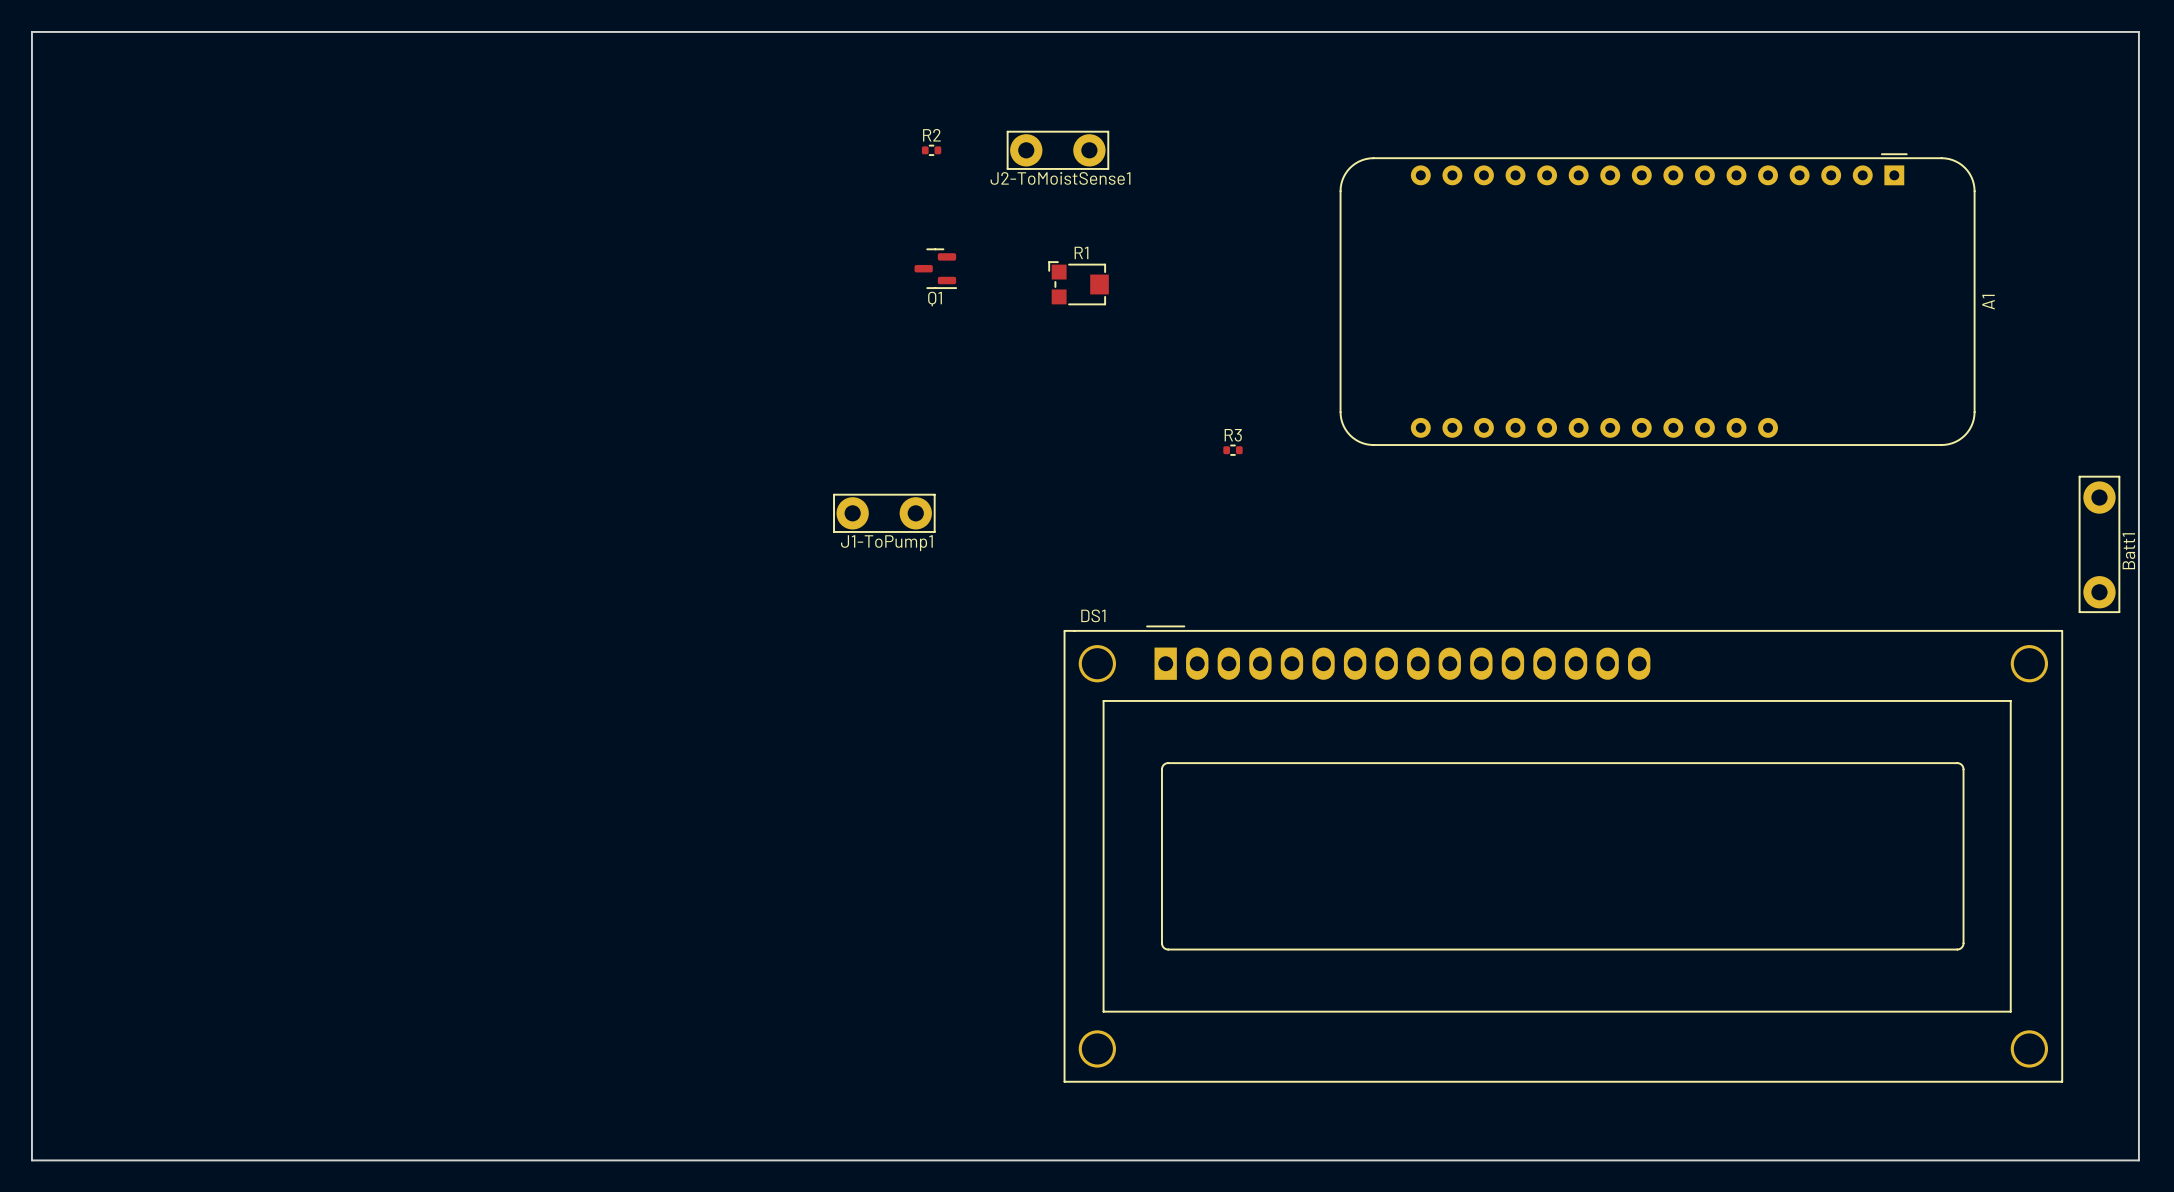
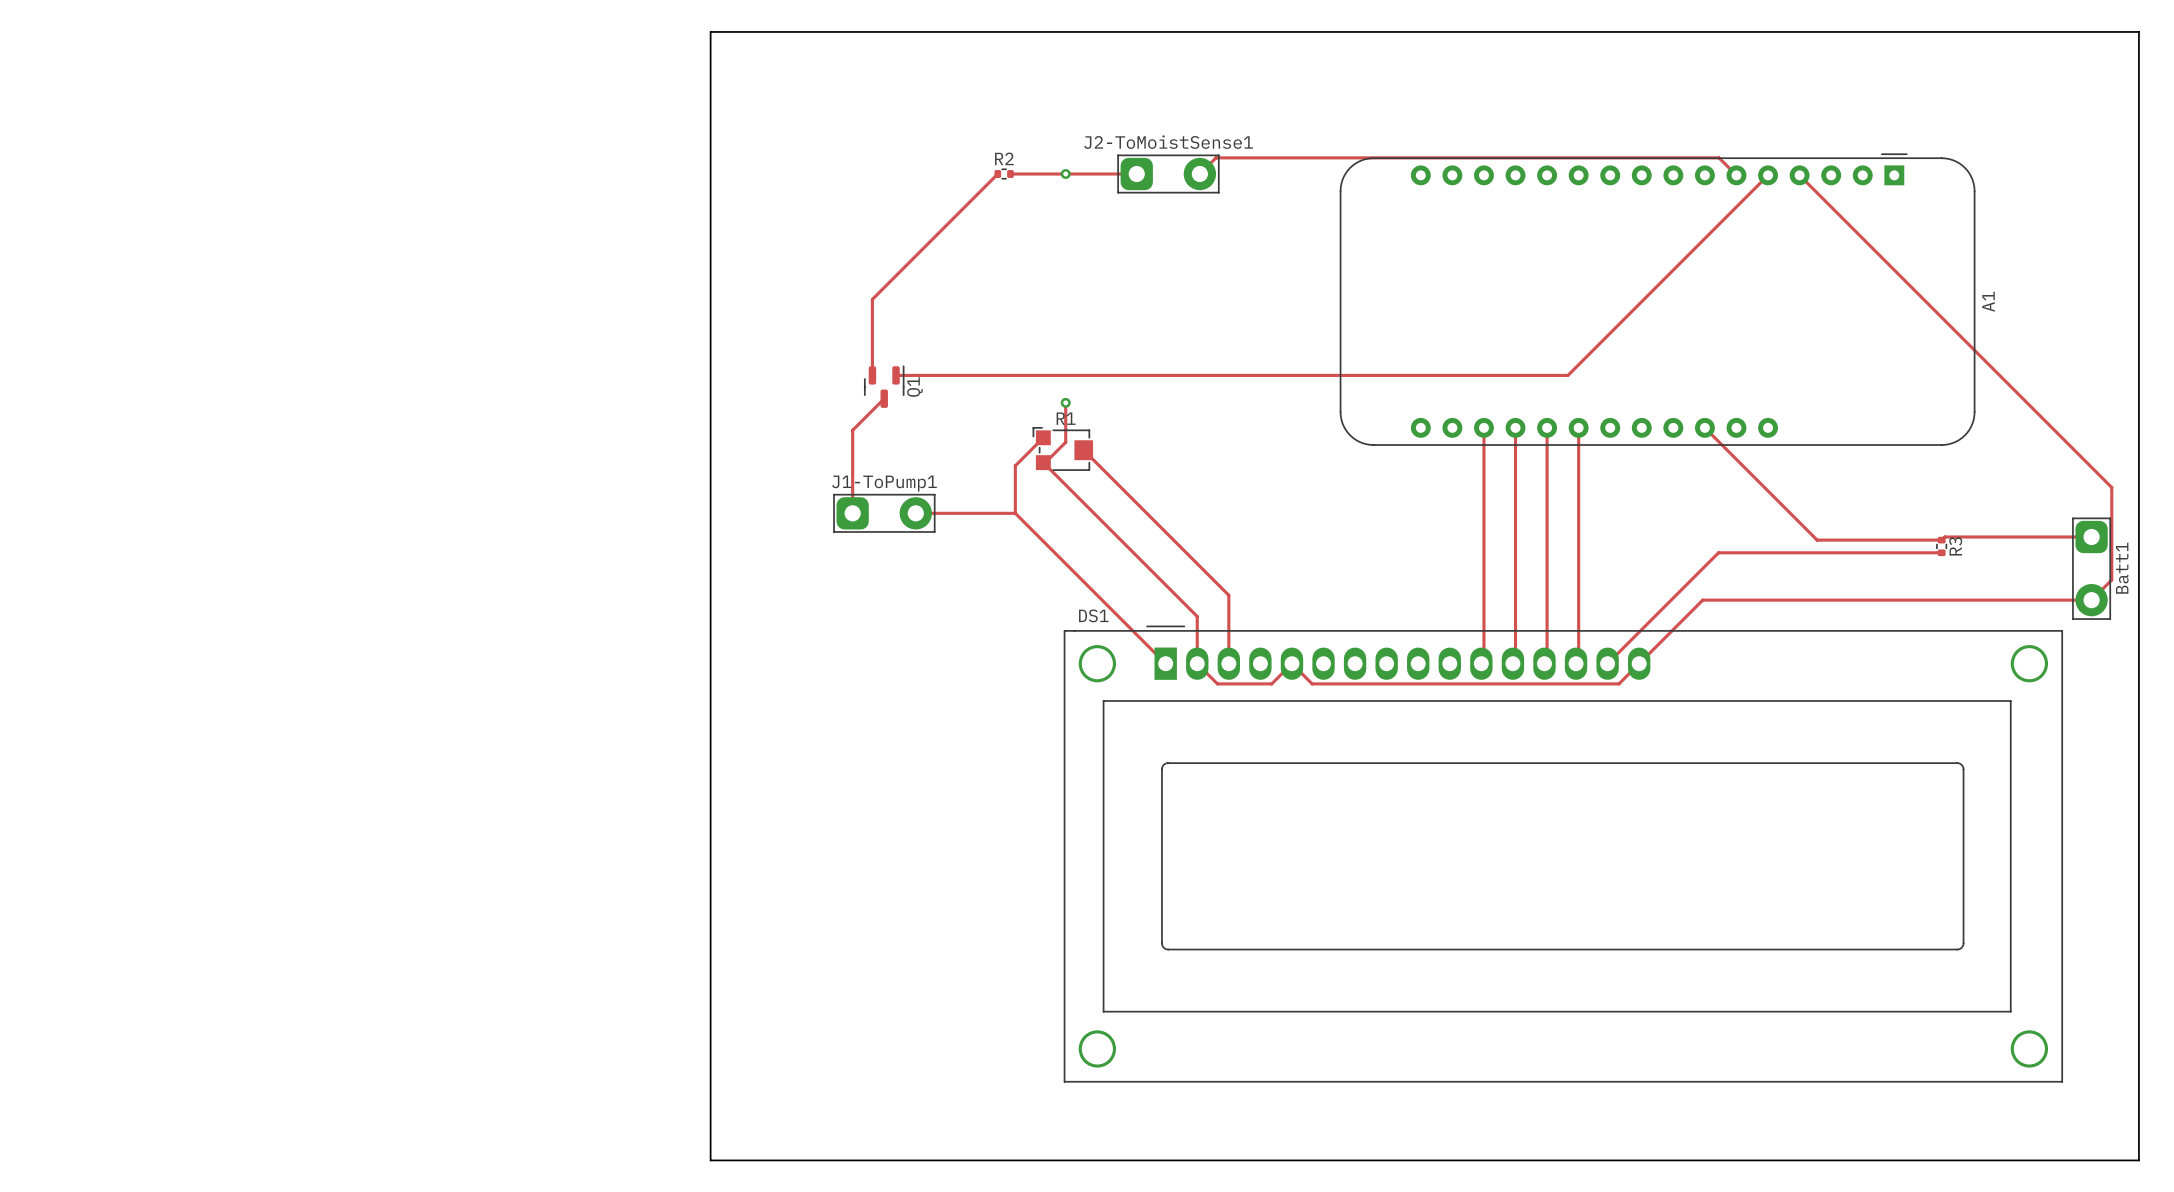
board edge: (710, 31) (31, 31) (31, 1160) (710, 1160) -> (710, 31) (710, 1160)
J2-ToMoistSense1 footprint: [1006, 130, 1110, 170] -> [1117, 154, 1220, 194]
R2 position: (931, 150) -> (1004, 174)
track: none -> (997, 174) (872, 299) (872, 375)
track: none -> (1010, 174) (1136, 174)
via: none -> (1065, 174)
track: none -> (1199, 174) (1216, 157) (1718, 157) (1736, 175)
track: none -> (1768, 175) (1567, 375) (896, 375)
track: none -> (1799, 175) (2111, 487) (2111, 579) (2091, 600) (1702, 600) (1618, 683) (1312, 683) (1291, 663) (1271, 683) (1217, 683) (1197, 663) (1197, 616) (1043, 462) (1065, 442) (1065, 402)
J2-ToMoistSense1 name position: J2-ToMoistSense1 (1060, 178) -> J2-ToMoistSense1 (1168, 142)
Q1 rotation: 0° (935, 268) -> 90° counterclockwise (884, 386)
Q1 position: (935, 268) -> (884, 386)
R1 position: (1078, 283) -> (1062, 448)
track: none -> (884, 398) (852, 430) (852, 513)
via: none -> (1065, 402)
track: none -> (1483, 427) (1483, 661) (1481, 663)
track: none -> (1515, 427) (1515, 661) (1512, 663)
track: none -> (1547, 427) (1547, 661) (1544, 663)
track: none -> (1578, 427) (1578, 661) (1576, 663)
track: none -> (1704, 427) (1817, 540) (1941, 540) (1944, 537) (2091, 537)
track: none -> (1043, 437) (1015, 465) (1015, 513)
track: none -> (1083, 450) (1228, 595) (1228, 663)
R3 rotation: 0° (1232, 450) -> 90° clockwise (1941, 546)
R3 position: (1232, 450) -> (1941, 546)
Batt1 footprint: [2078, 475, 2121, 613] -> [2072, 517, 2111, 620]
J1-ToPump1 footprint: [833, 493, 936, 533] -> [833, 493, 936, 533]
track: none -> (915, 513) (1015, 513)
track: none -> (1015, 513) (1165, 663)
J1-ToPump1 name position: J1-ToPump1 (886, 543) -> J1-ToPump1 (884, 483)
track: none -> (1941, 552) (1718, 552) (1607, 663)

